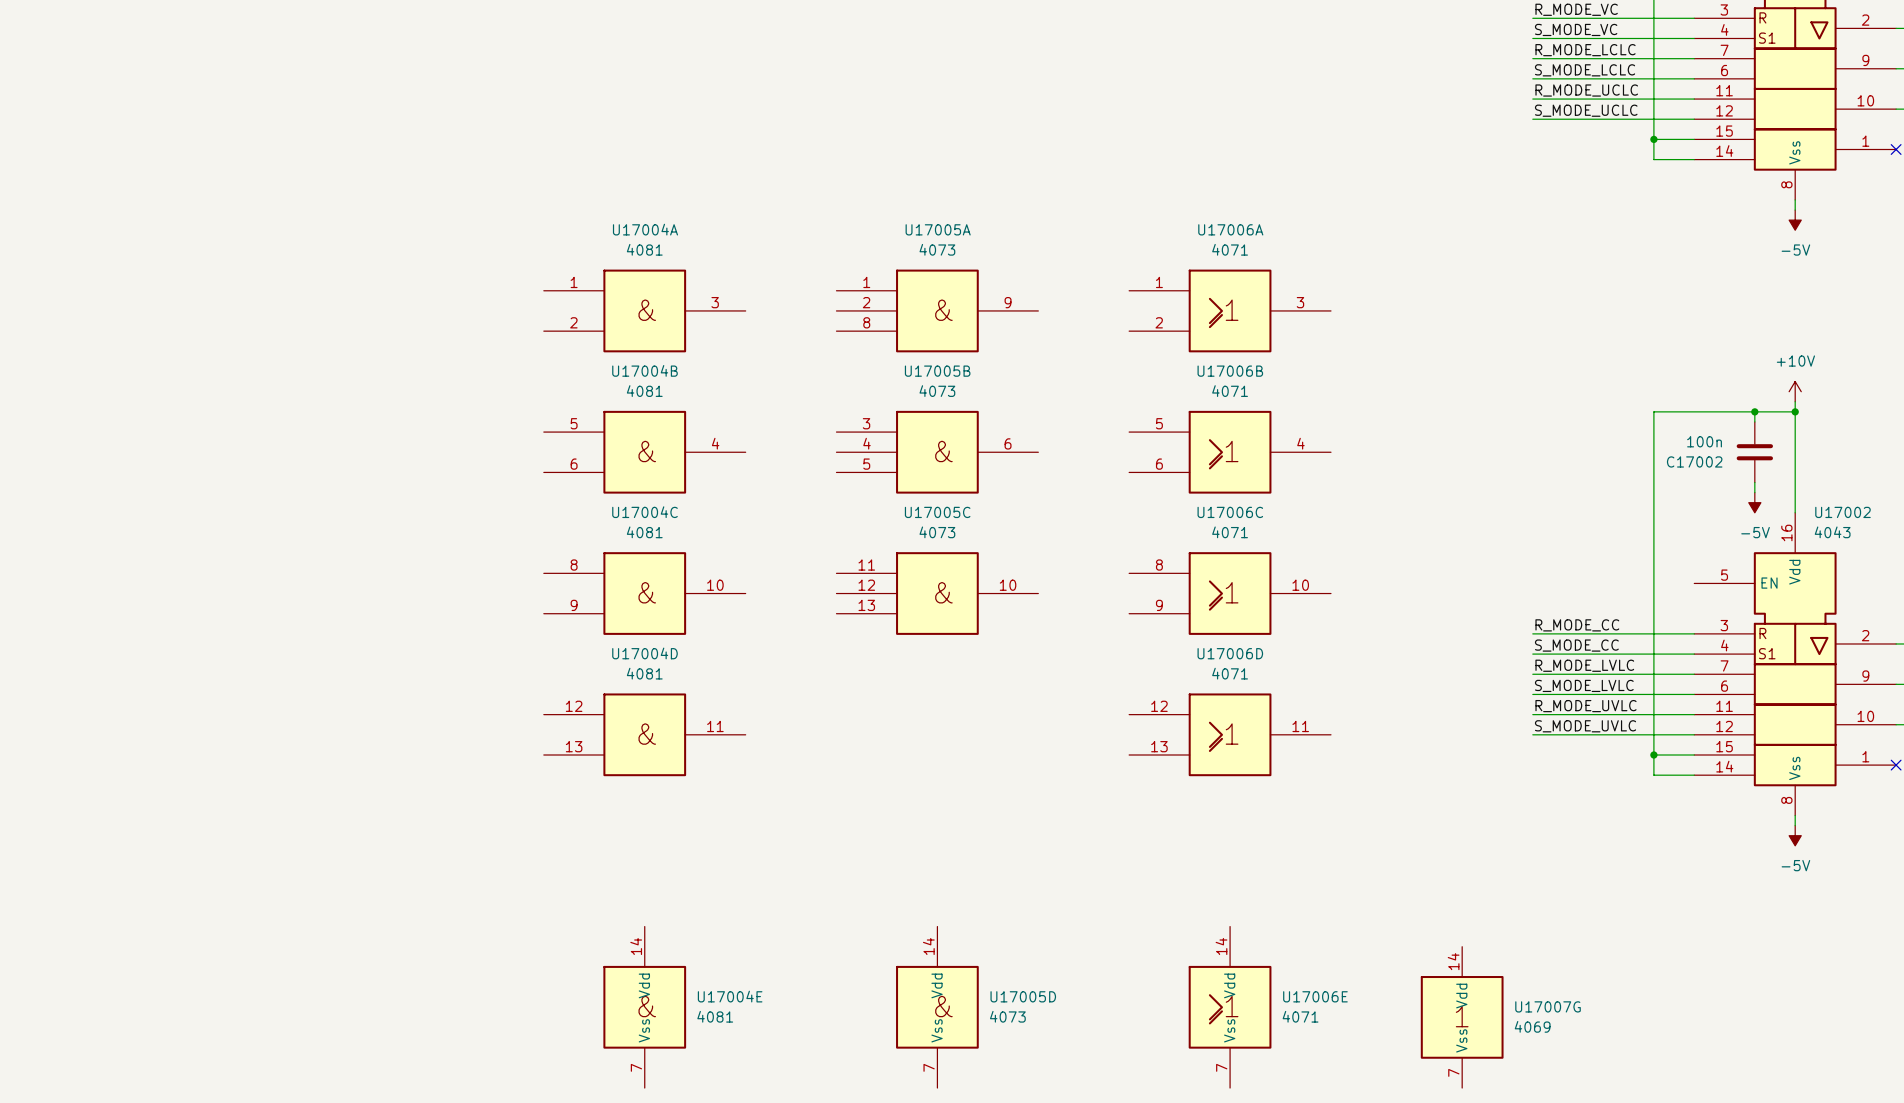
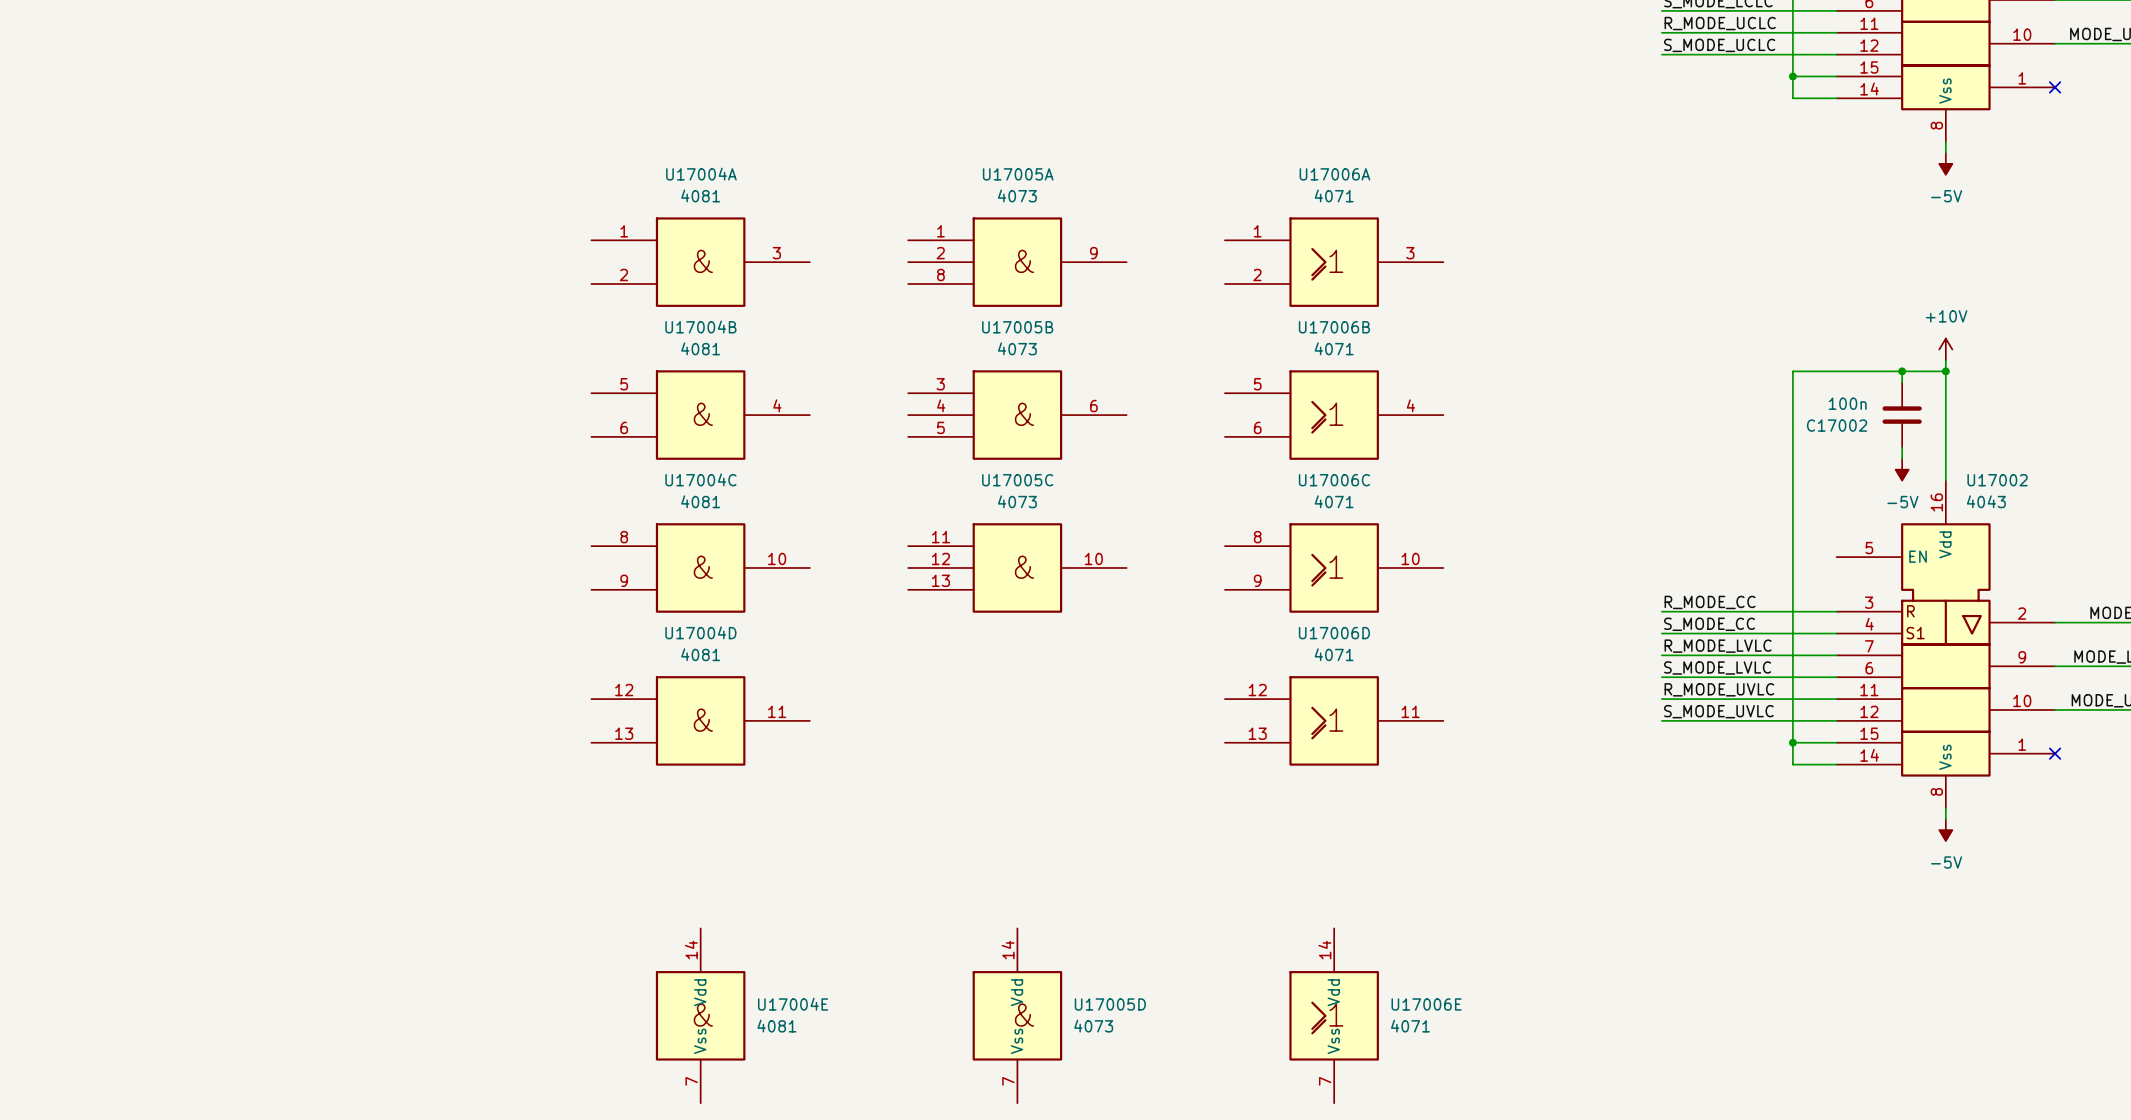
U17007G: 4069 (1462, 1017) -> none

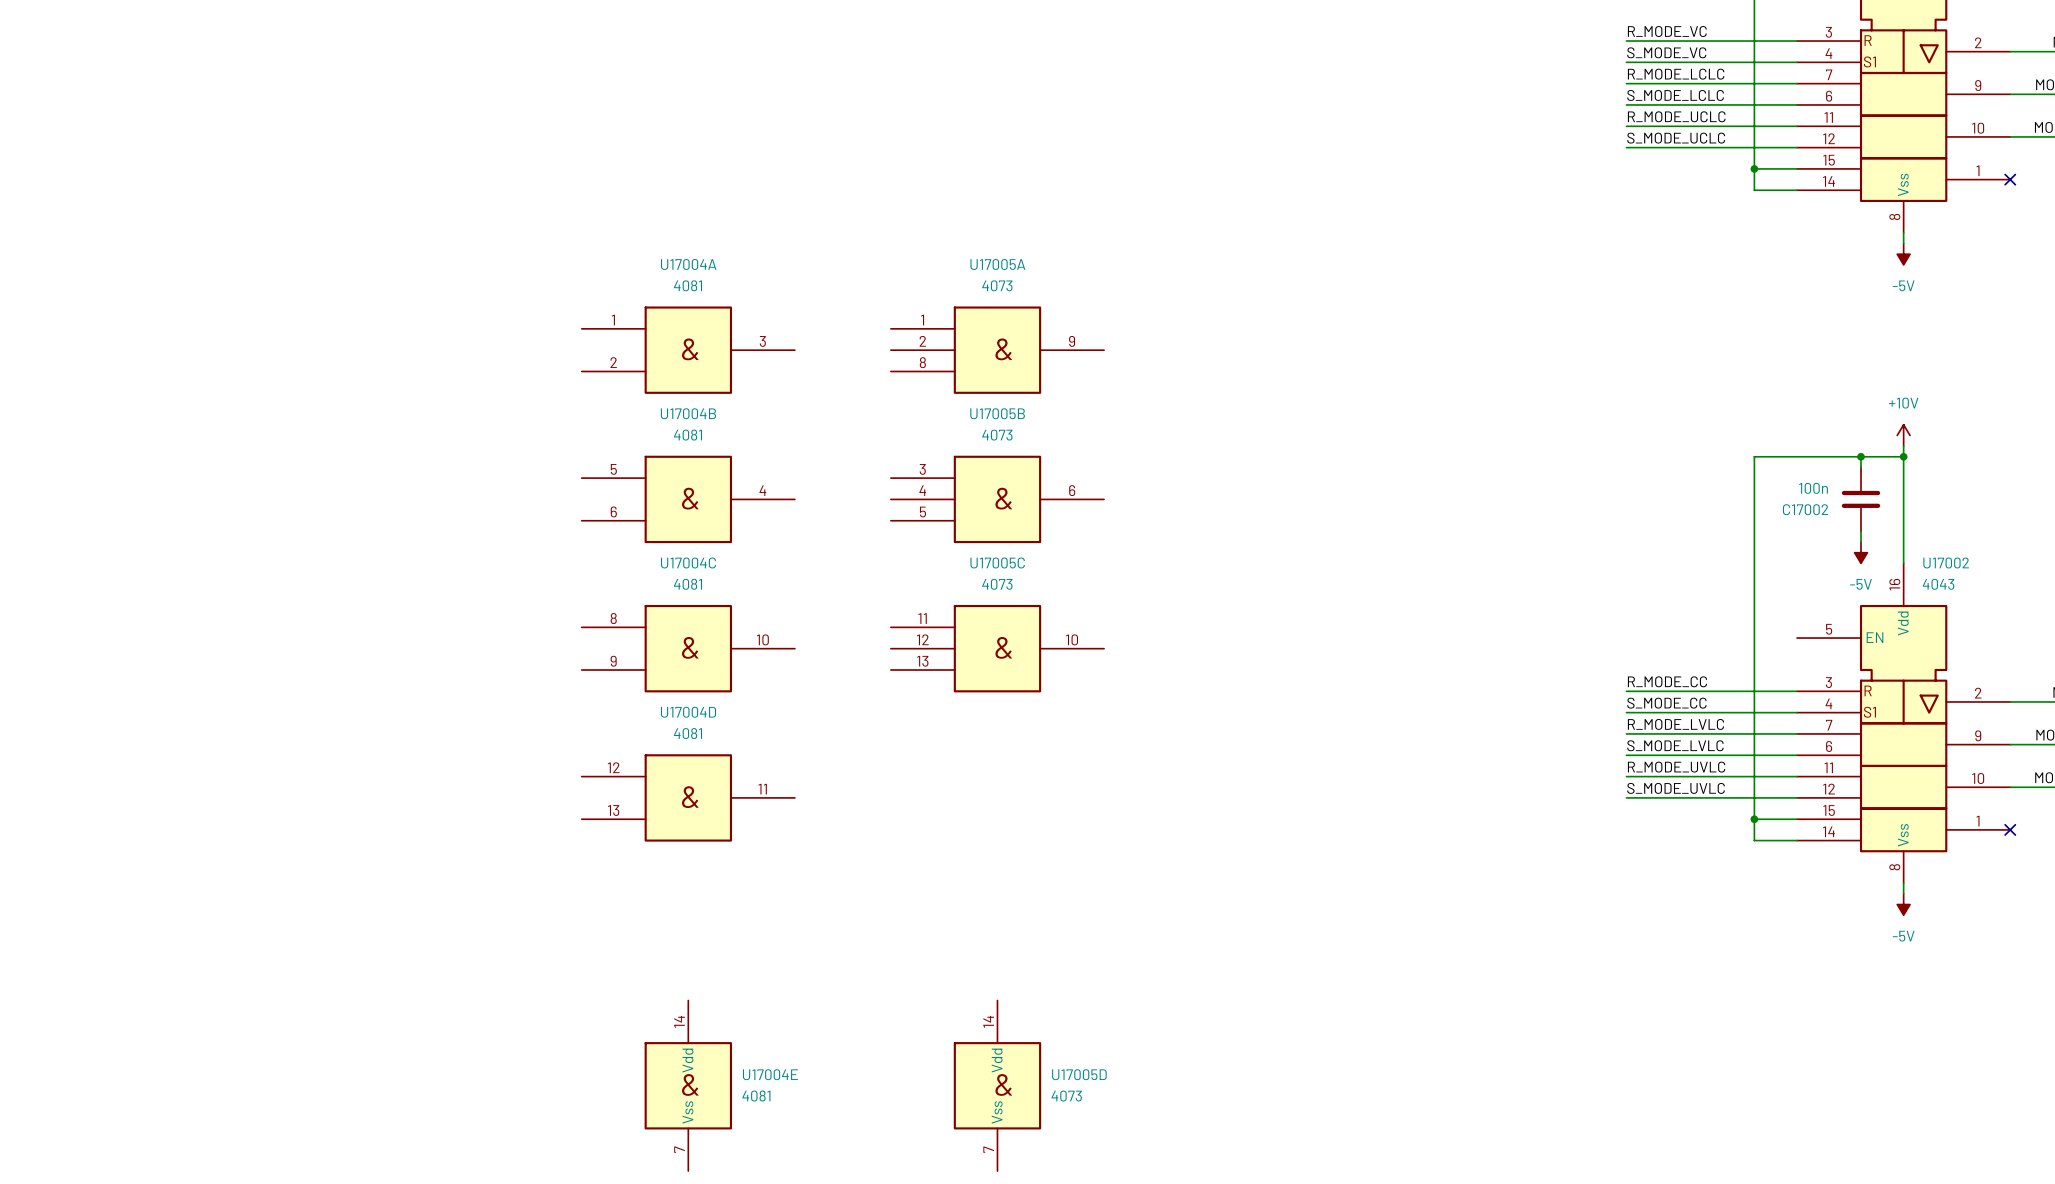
U17006A: 4071 (1334, 262) -> none
U17006B: 4071 (1334, 415) -> none
U17006C: 4071 (1334, 567) -> none
U17006D: 4071 (1334, 720) -> none
U17006E: 4071 (1334, 1015) -> none

